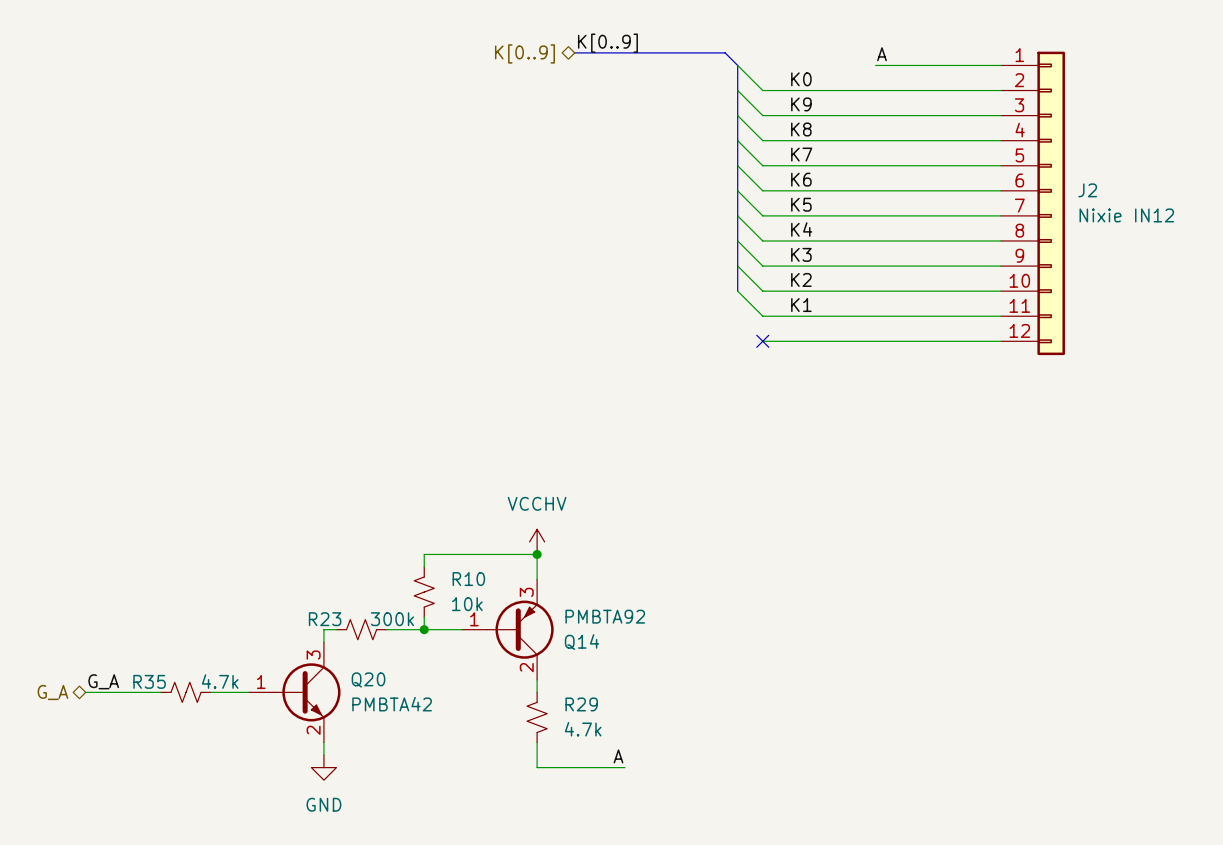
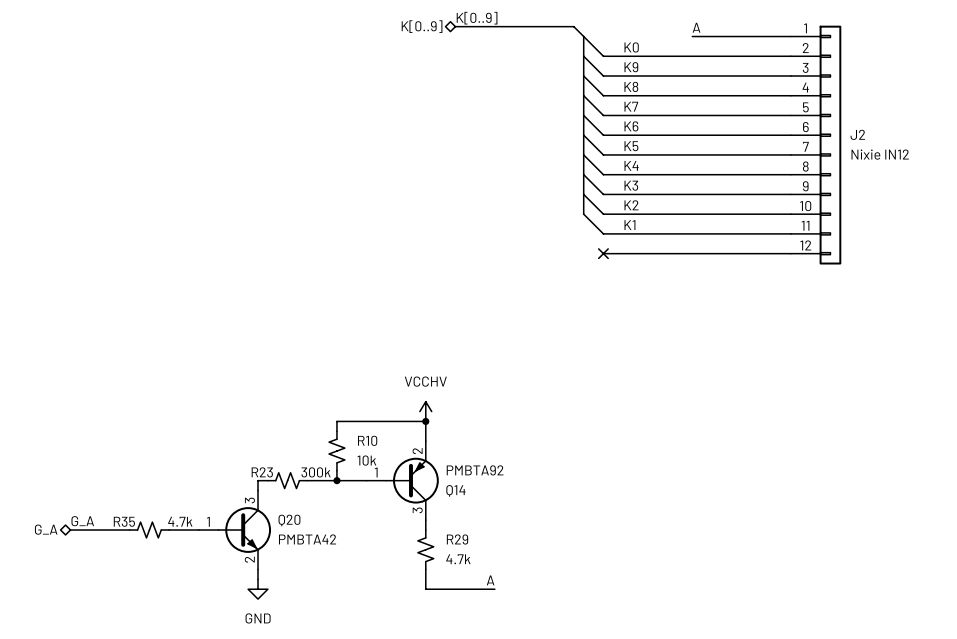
Q14 pin number: 3 (526, 592) -> 2 (417, 451)
Q14 pin number: 2 (526, 667) -> 3 (417, 510)

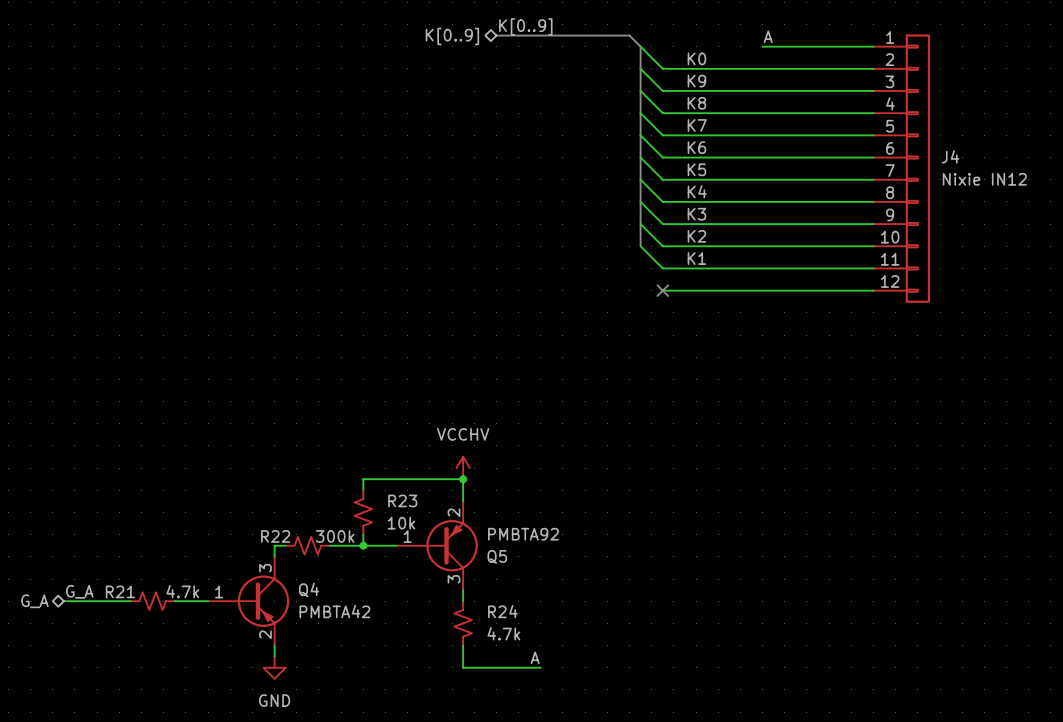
J2 name: J2 (857, 134) -> J4 (950, 156)
R10 name: R10 (367, 440) -> R23 (402, 500)
R23 name: R23 (262, 472) -> R22 (275, 536)
Q14 name: Q14 (455, 490) -> Q5 (497, 556)
R35 name: R35 (124, 521) -> R21 (120, 591)
Q20: PMBTA42 (234, 530) -> none
Q4: none -> PMBTA42 (248, 601)
R29 name: R29 (457, 539) -> R24 (502, 611)

